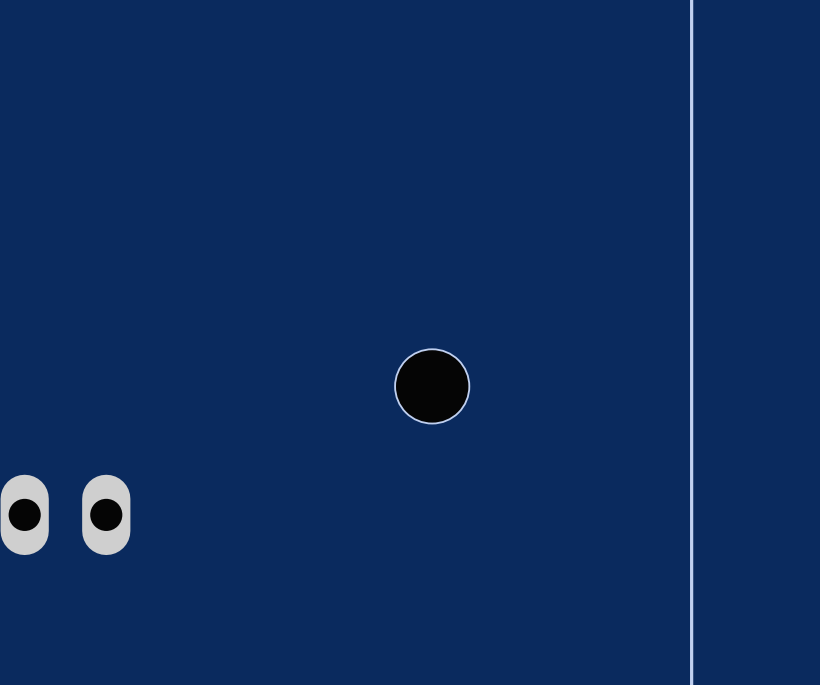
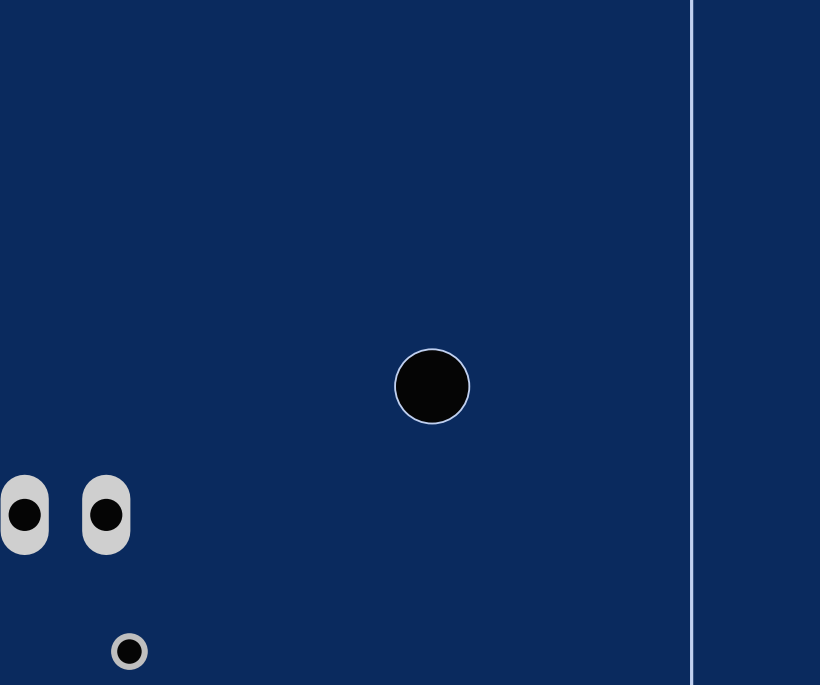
via: none -> (129, 651)

